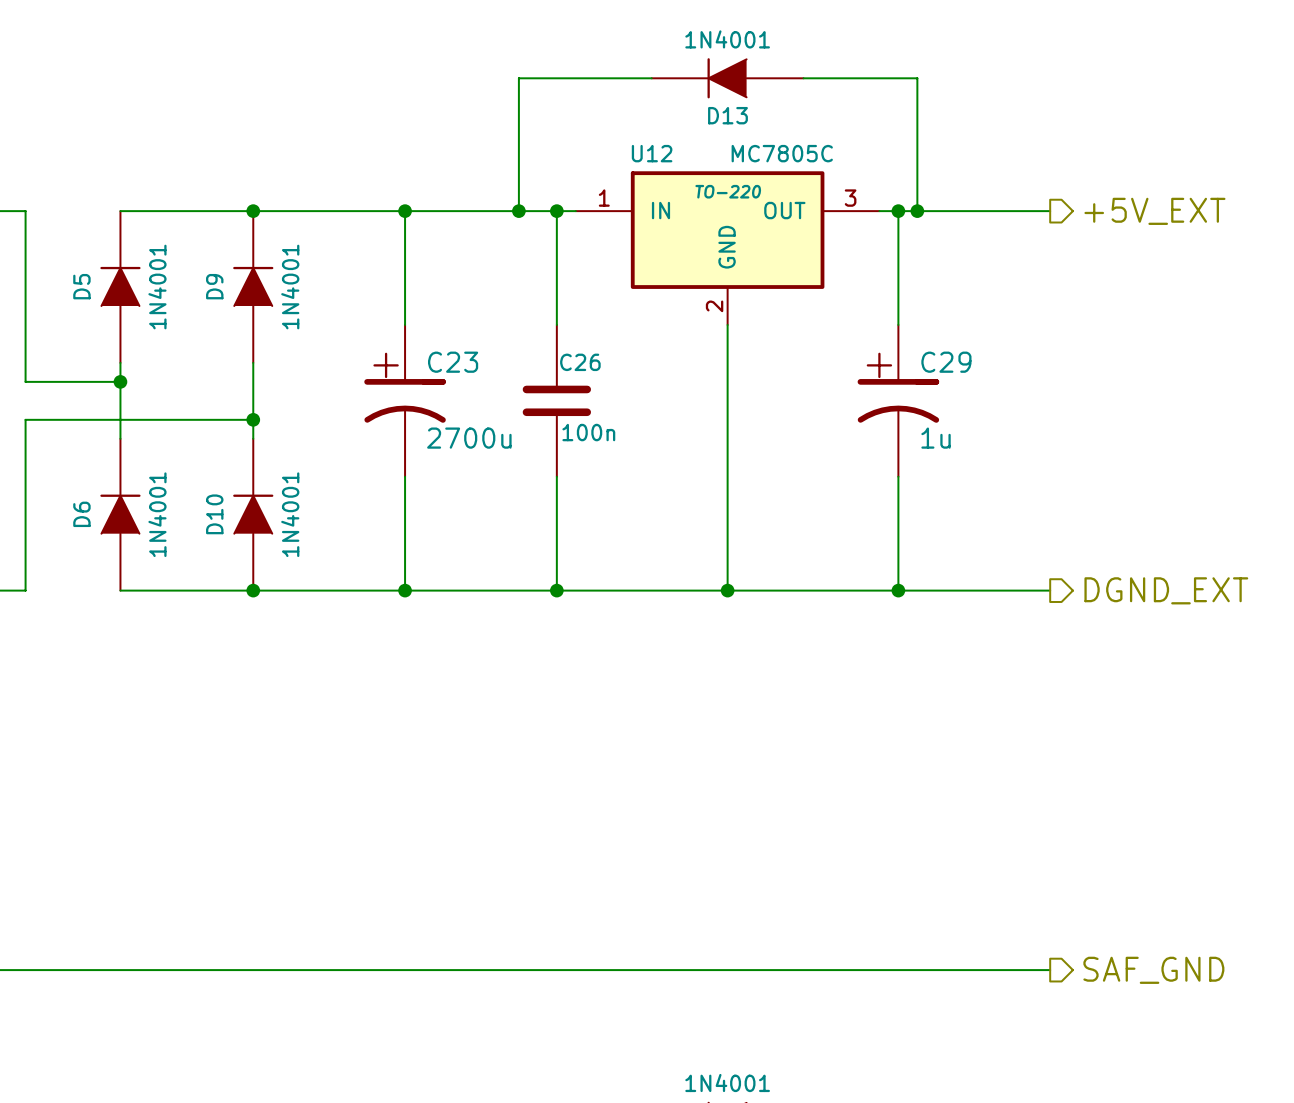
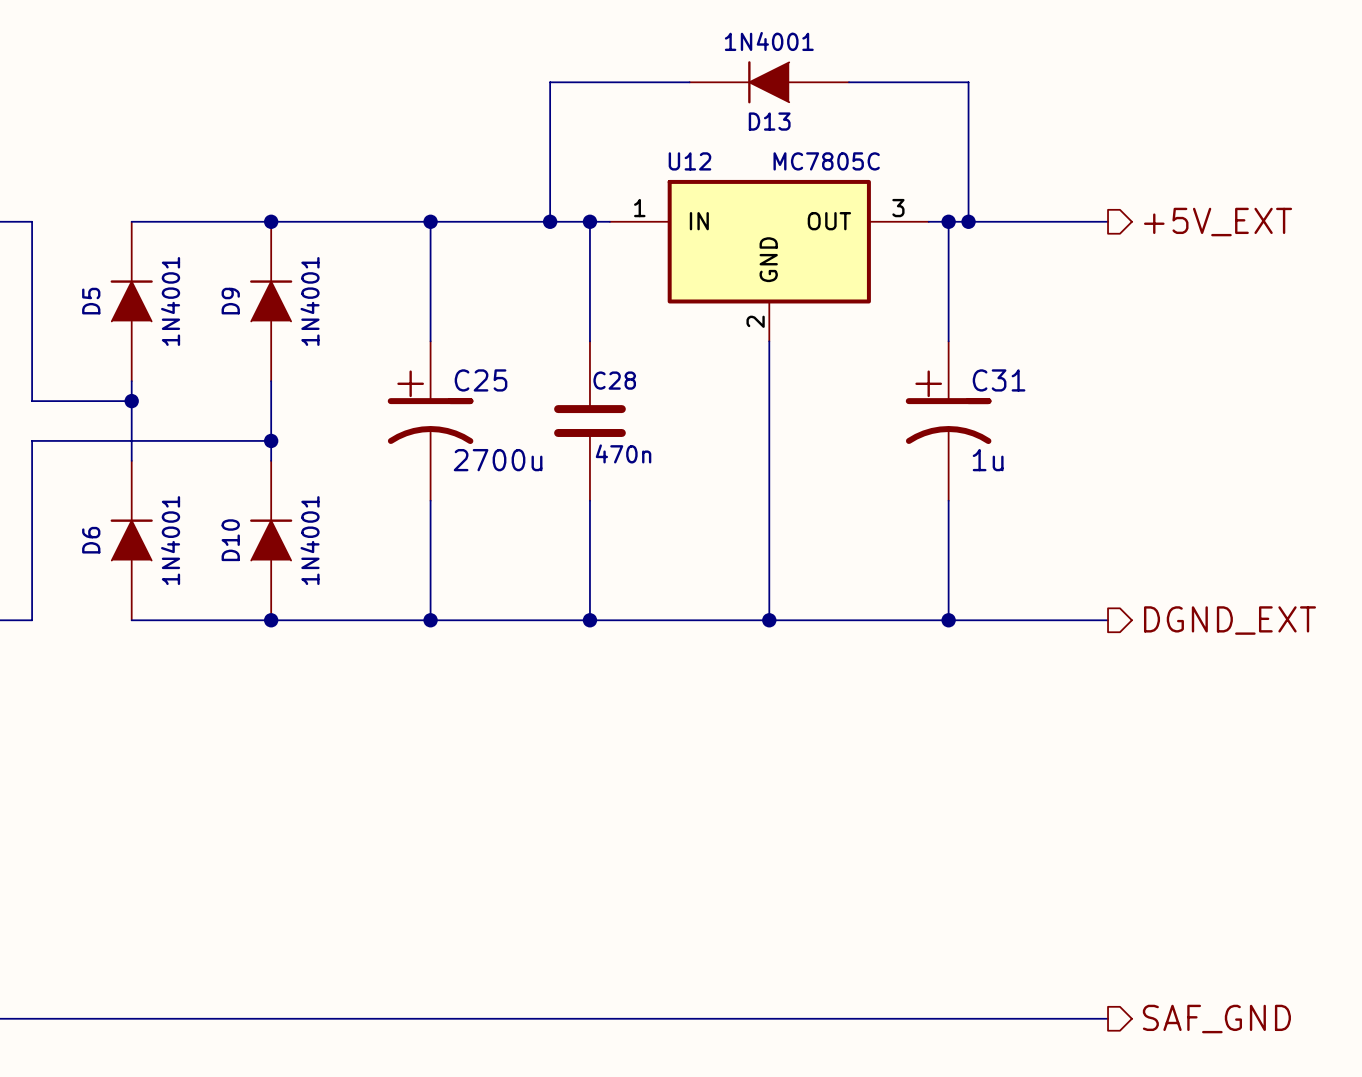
U12 text: TO-220 (728, 191) -> none
C23 name: C23 (453, 362) -> C25 (481, 380)
C26 name: C26 (580, 362) -> C28 (614, 380)
C29 name: C29 (946, 362) -> C31 (999, 380)
C26 value: 100n (588, 432) -> 470n (623, 453)

